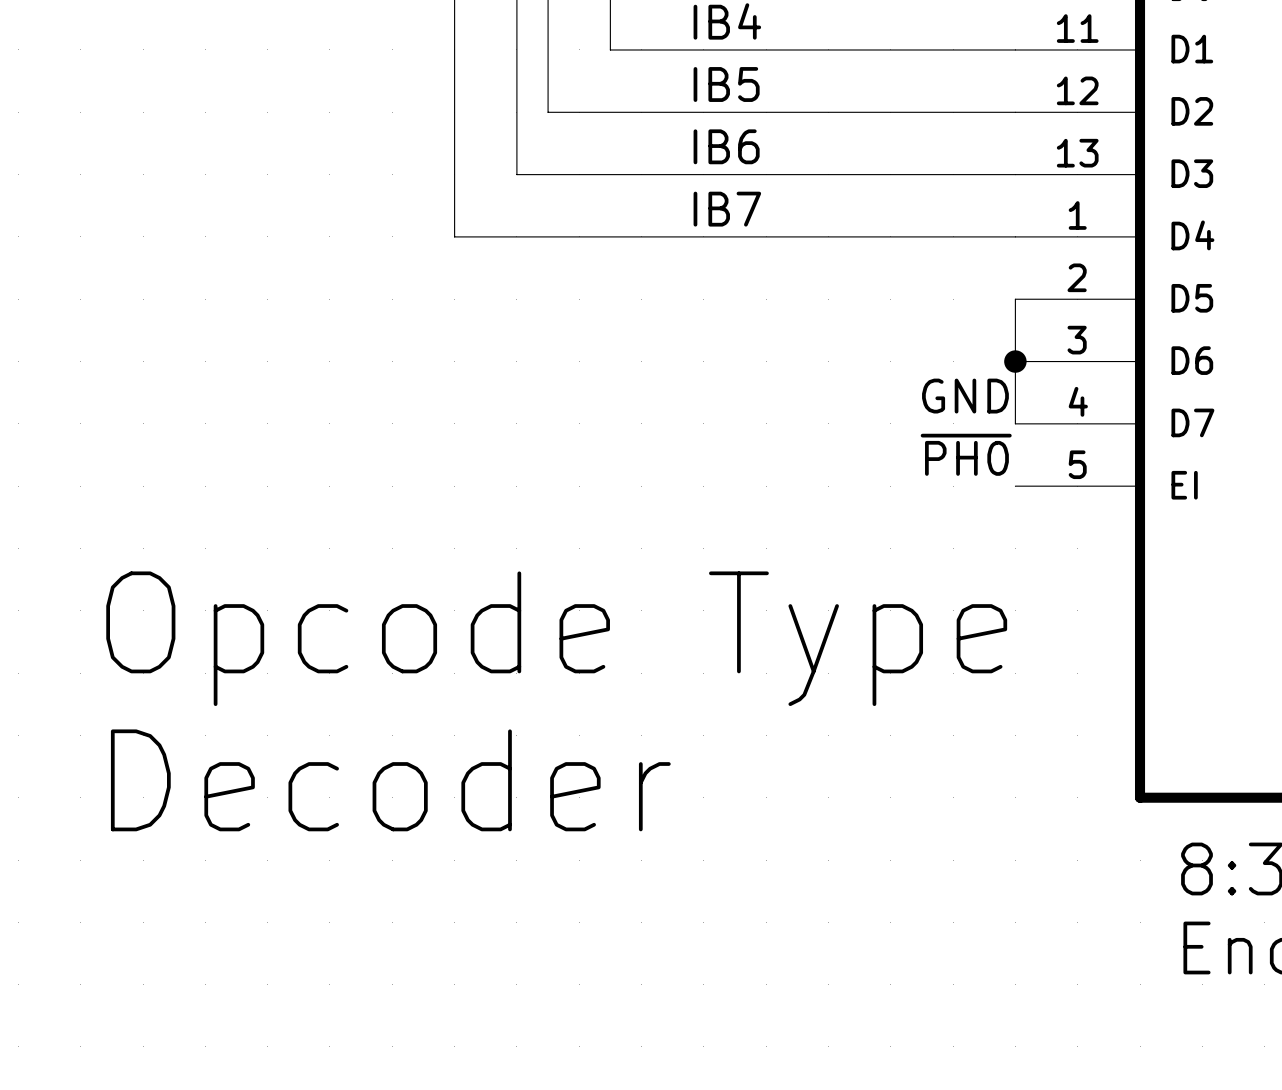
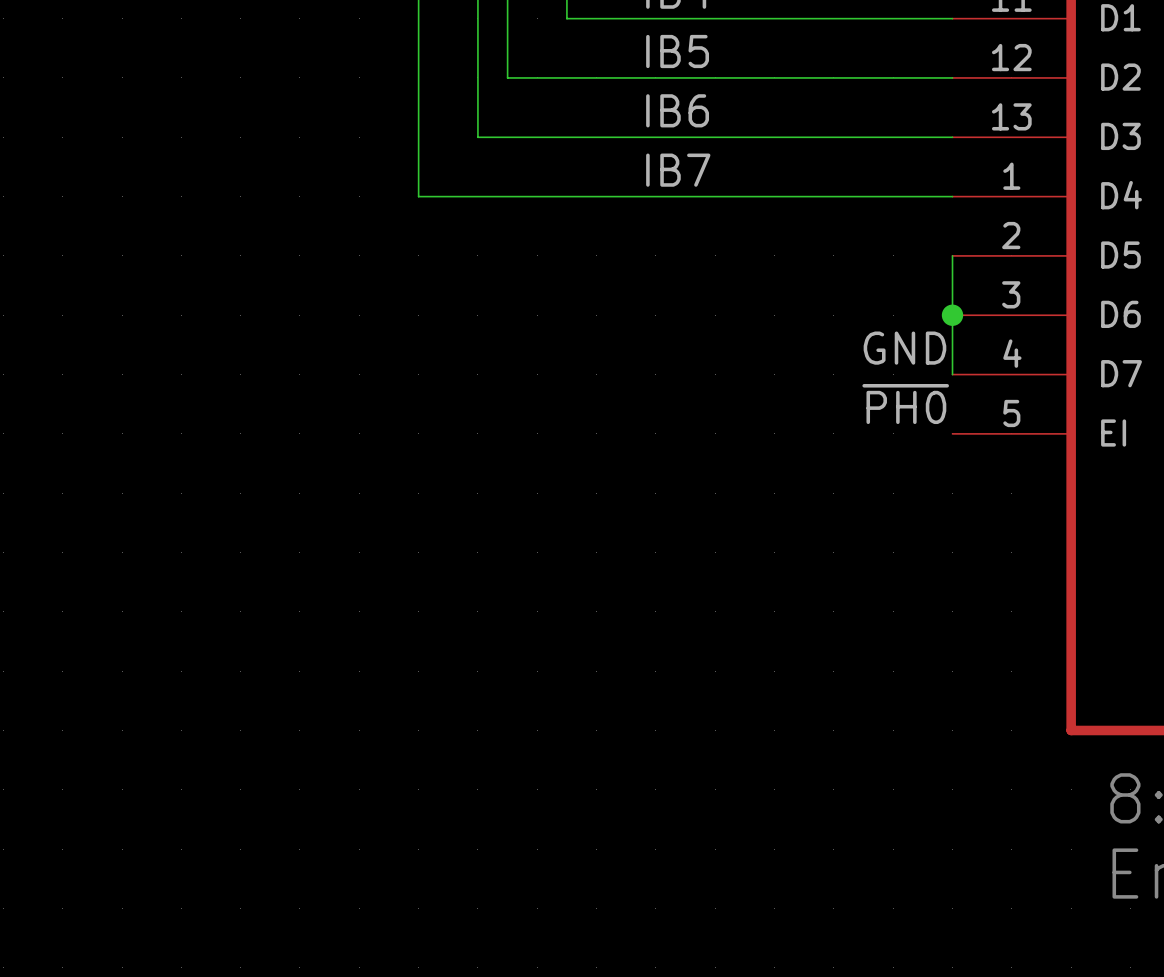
text: Opcode Type (556, 638) -> none
text: Decoder (390, 780) -> none

